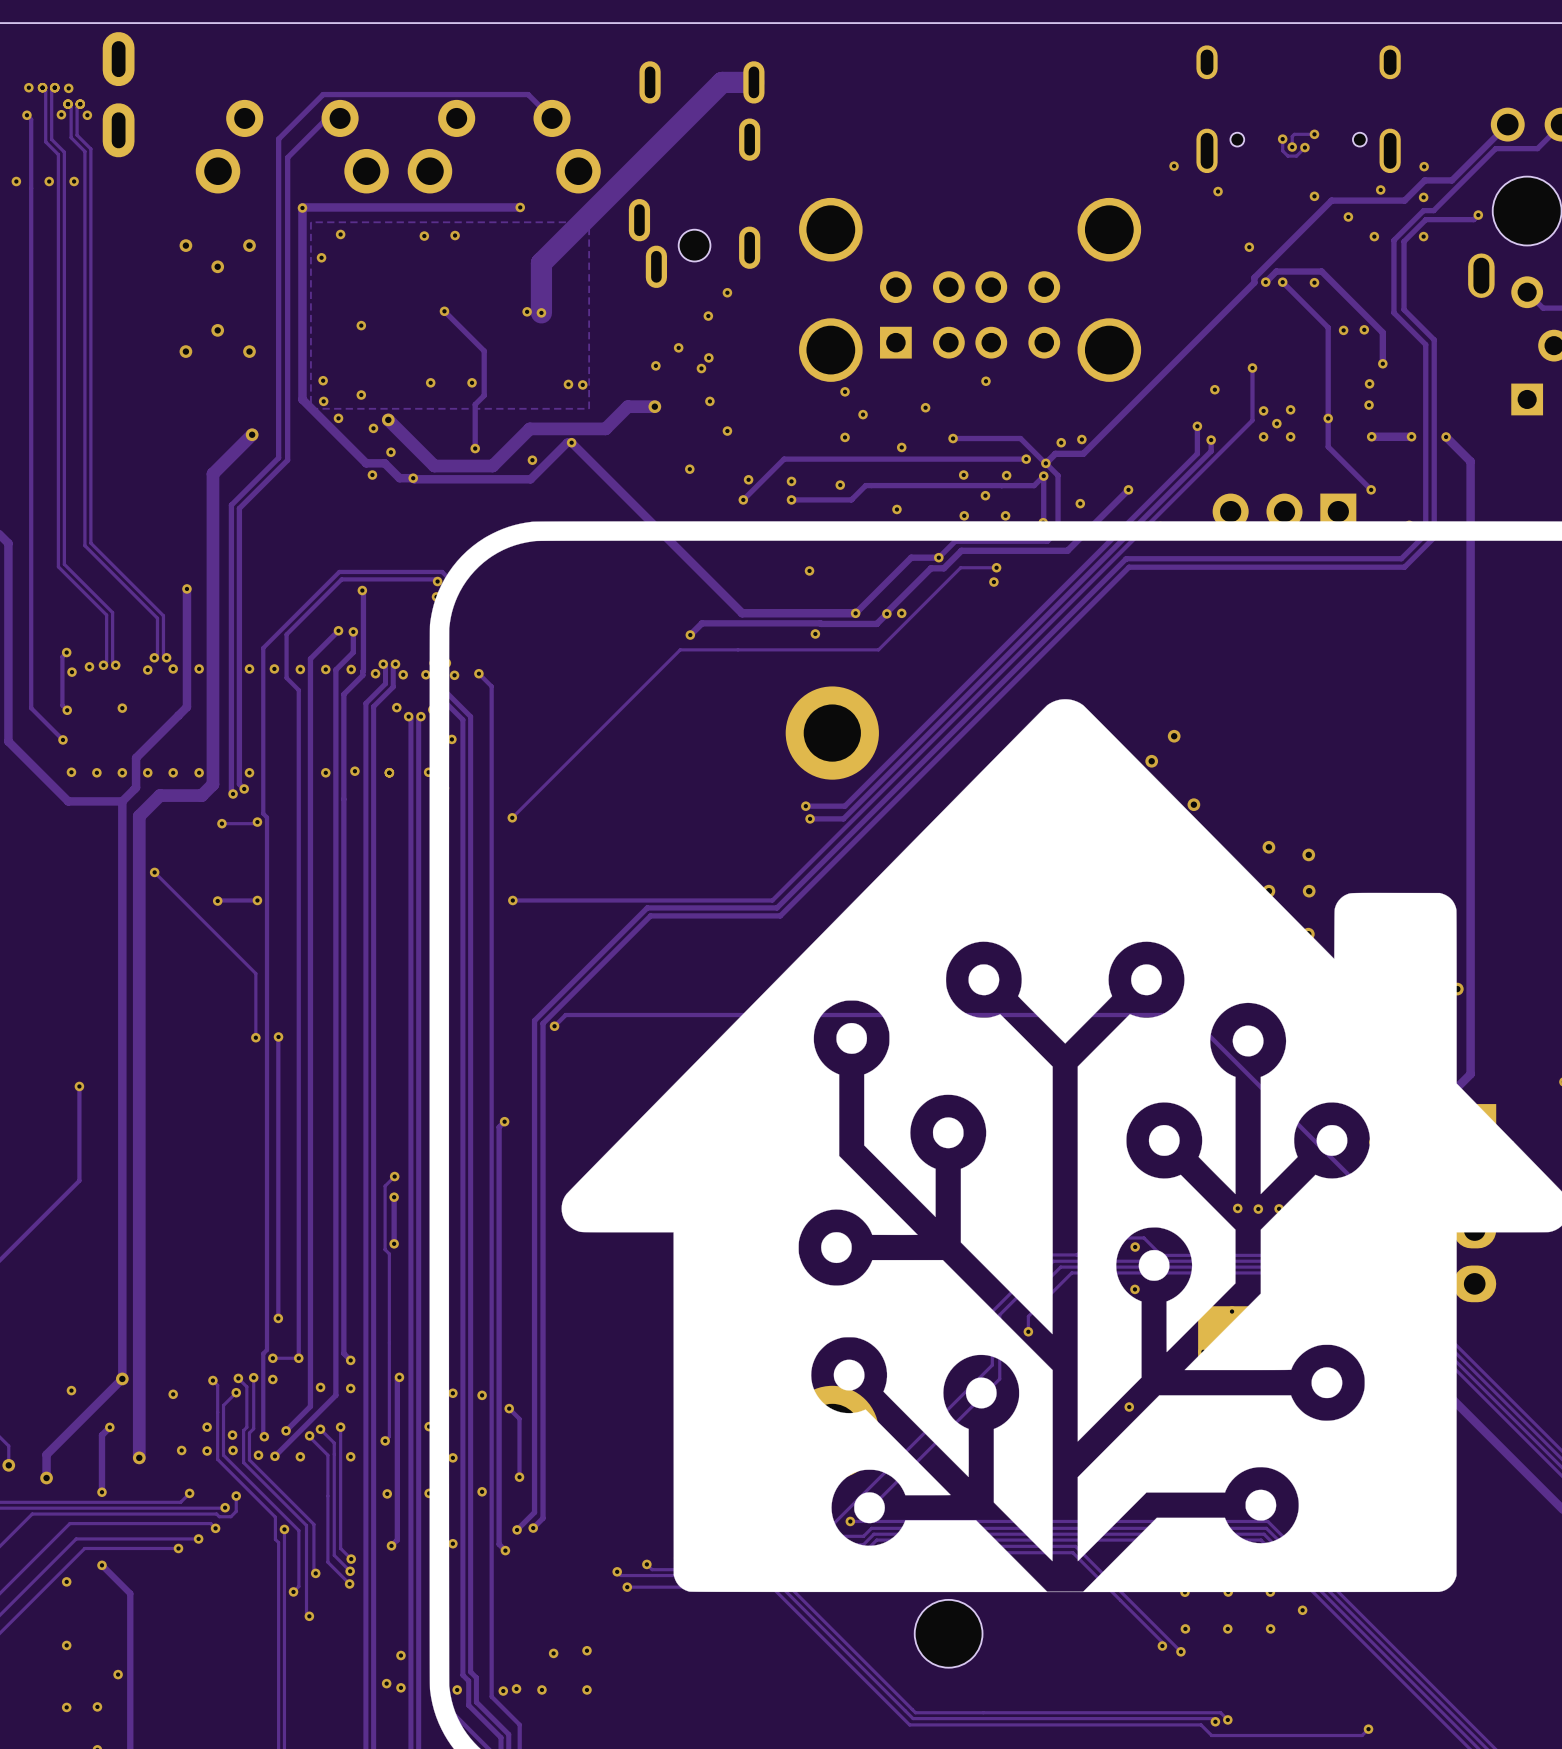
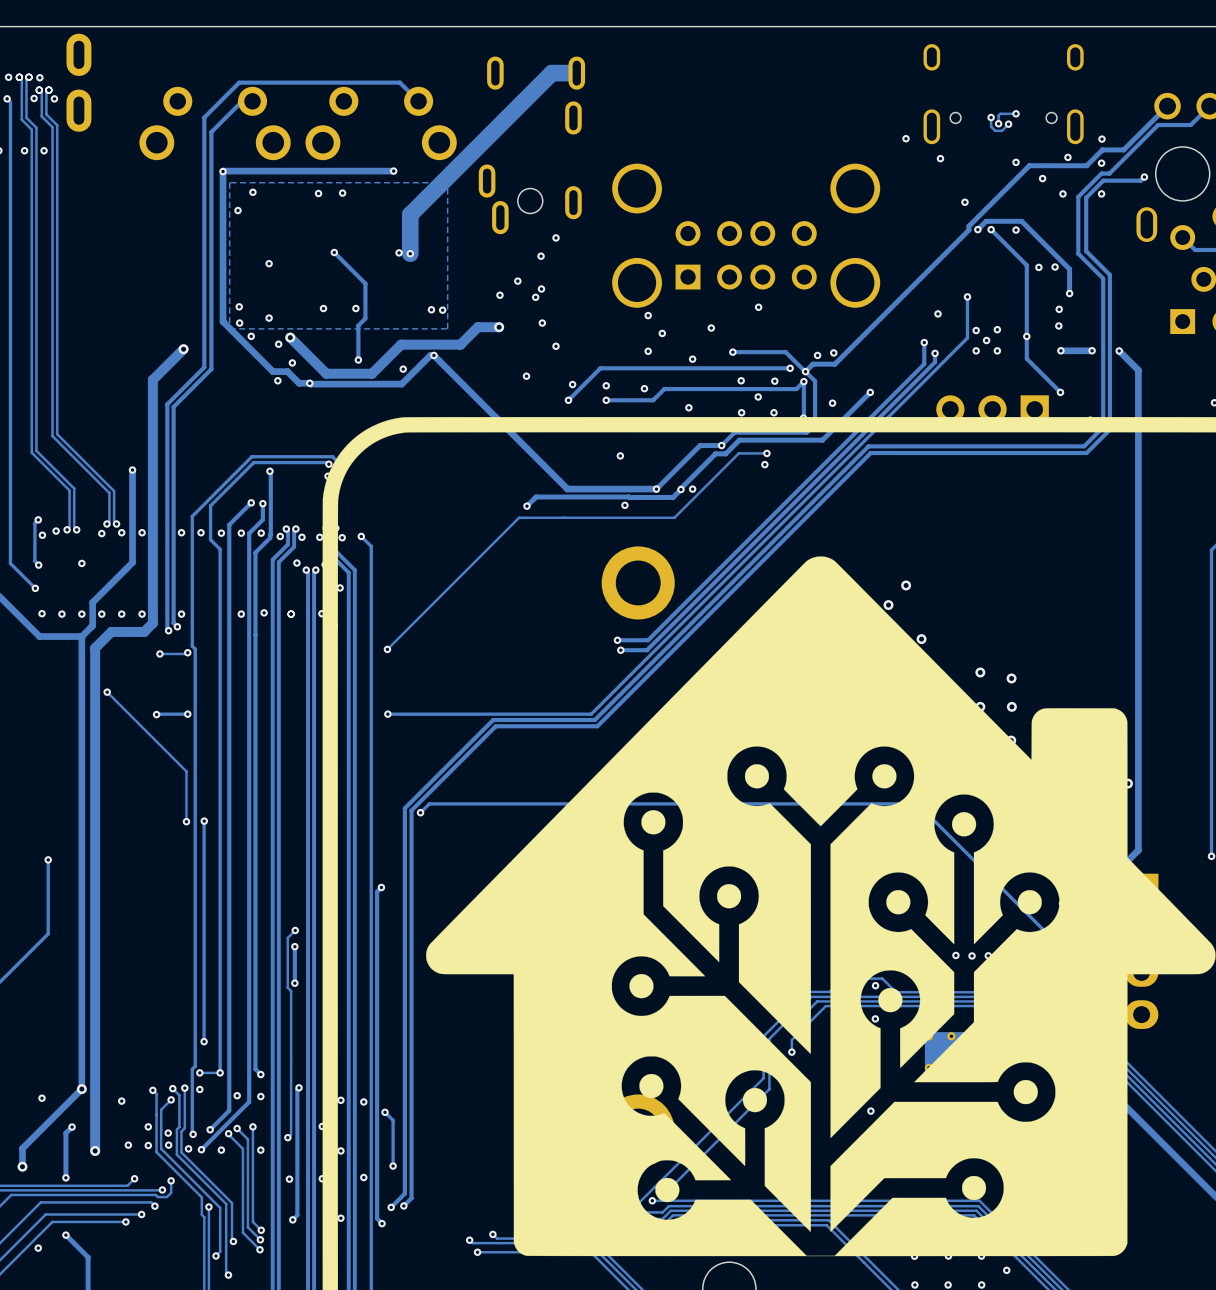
via: (185, 245) -> none
via: (249, 245) -> none
via: (217, 266) -> none
via: (217, 330) -> none
via: (185, 351) -> none
via: (249, 351) -> none

